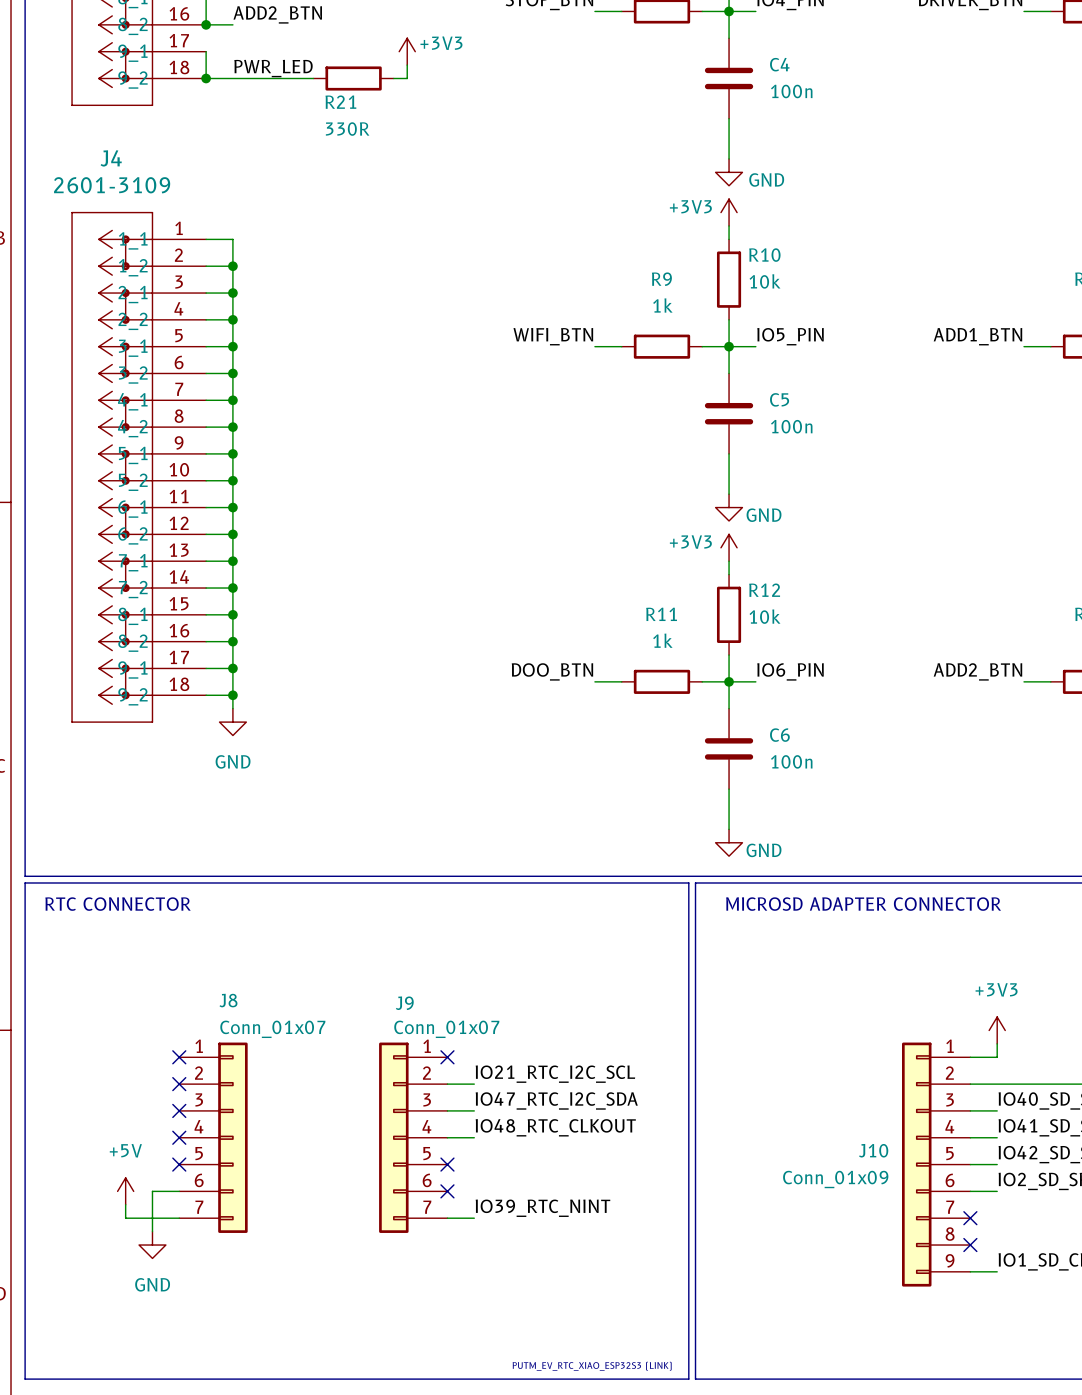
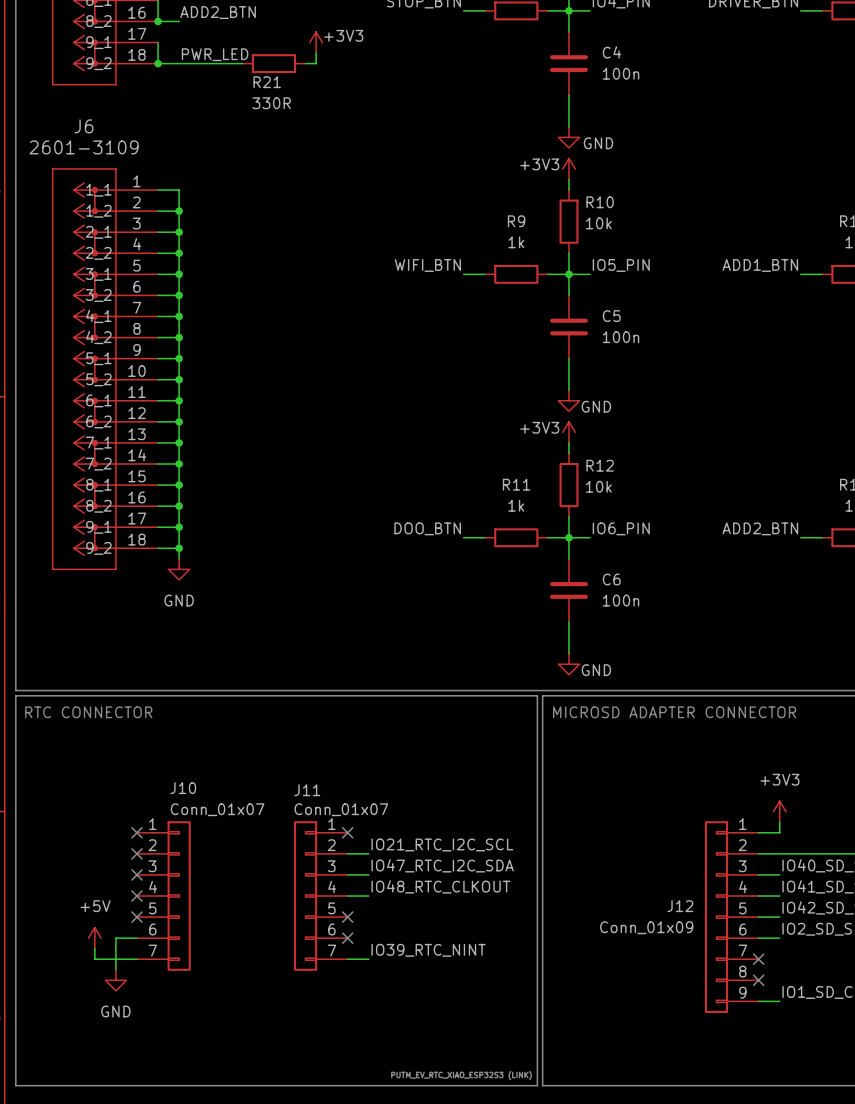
J4 name: J4 (111, 158) -> J6 (84, 126)
J8 name: J8 (228, 1000) -> J10 (183, 788)
J9 name: J9 (404, 1003) -> J11 (307, 790)
J10 name: J10 (873, 1150) -> J12 (680, 906)

